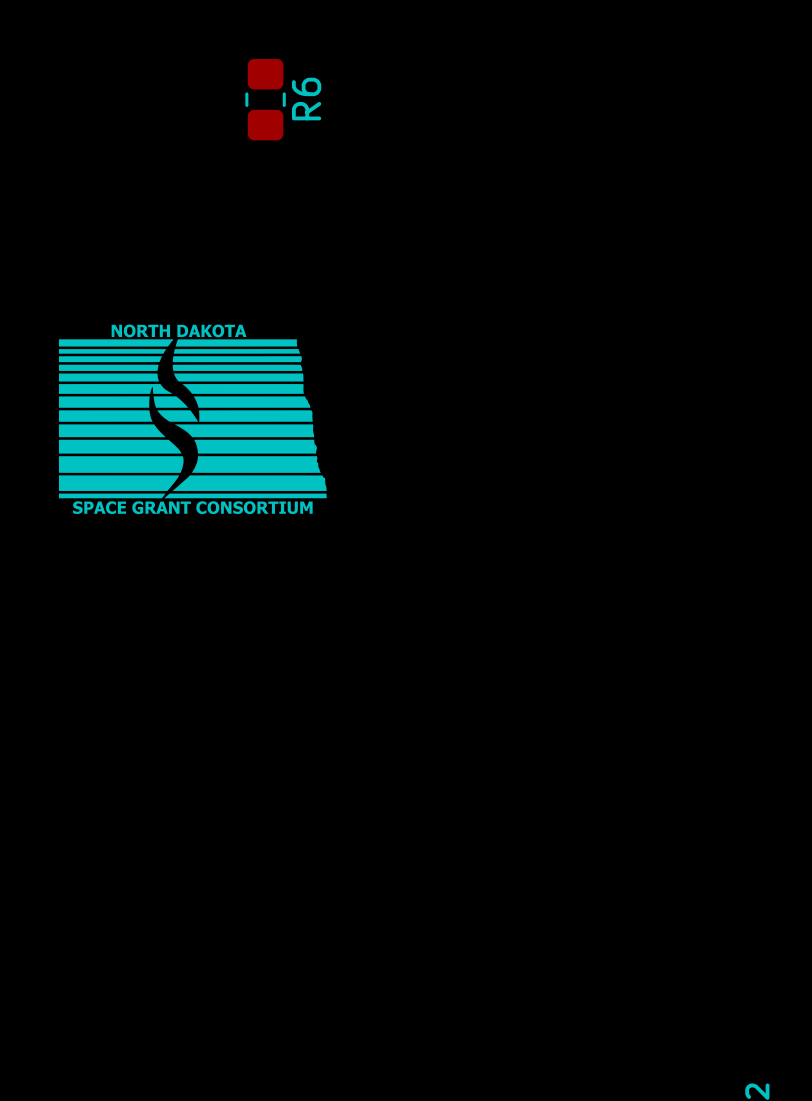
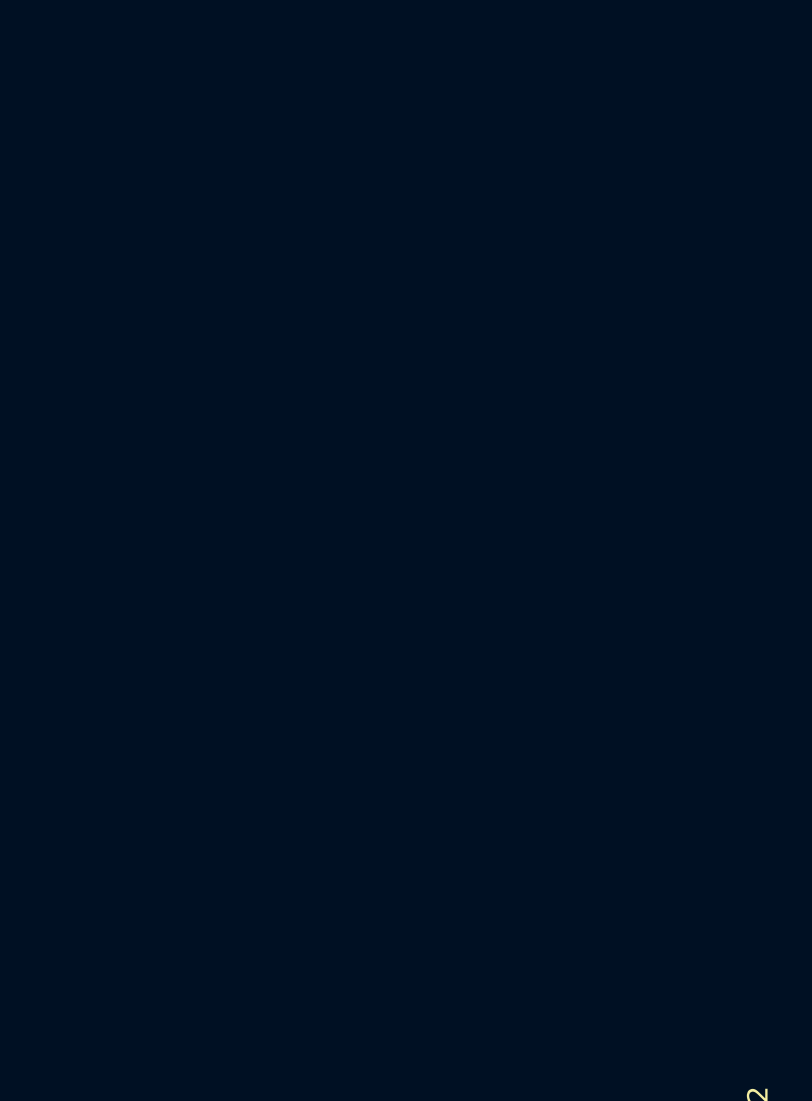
R6: (265, 99) -> none
drawing: [58, 324, 327, 515] -> none

